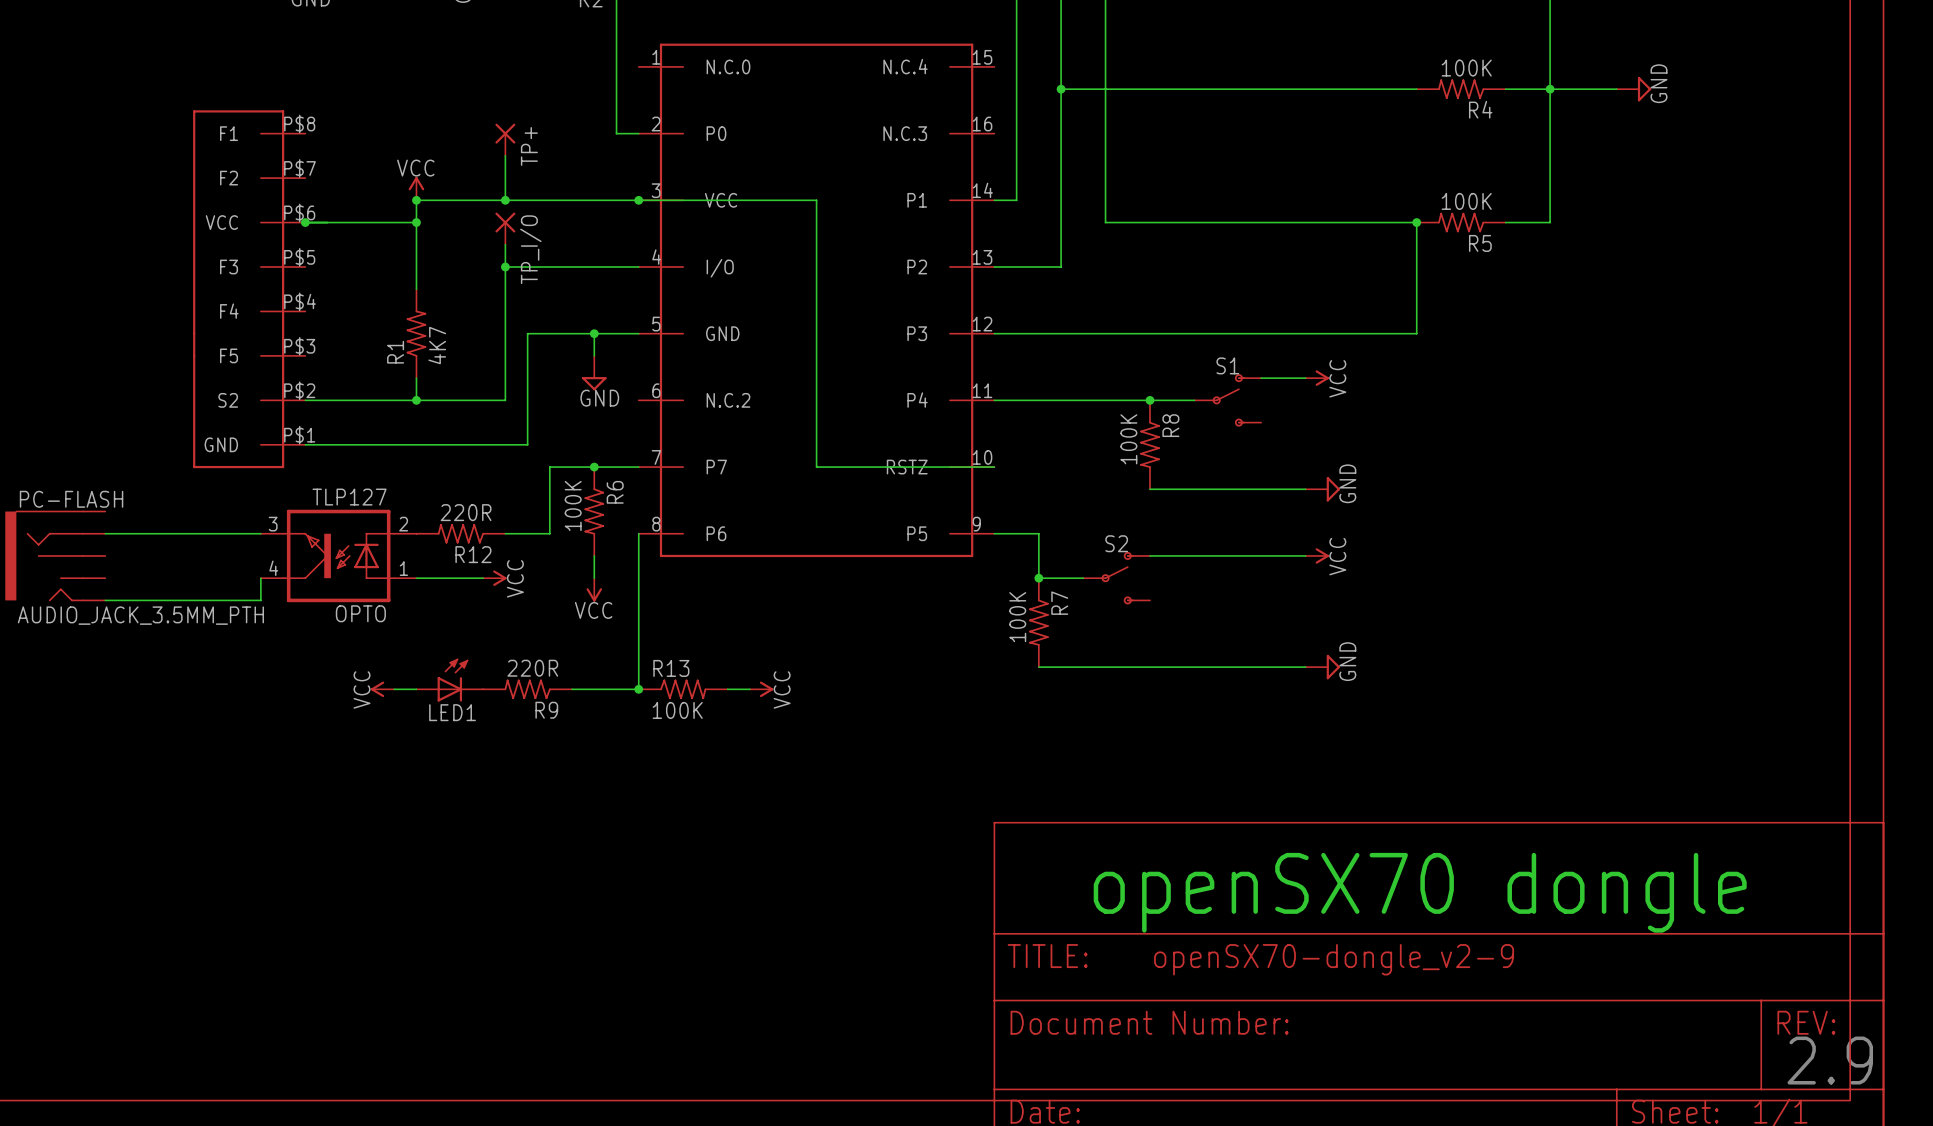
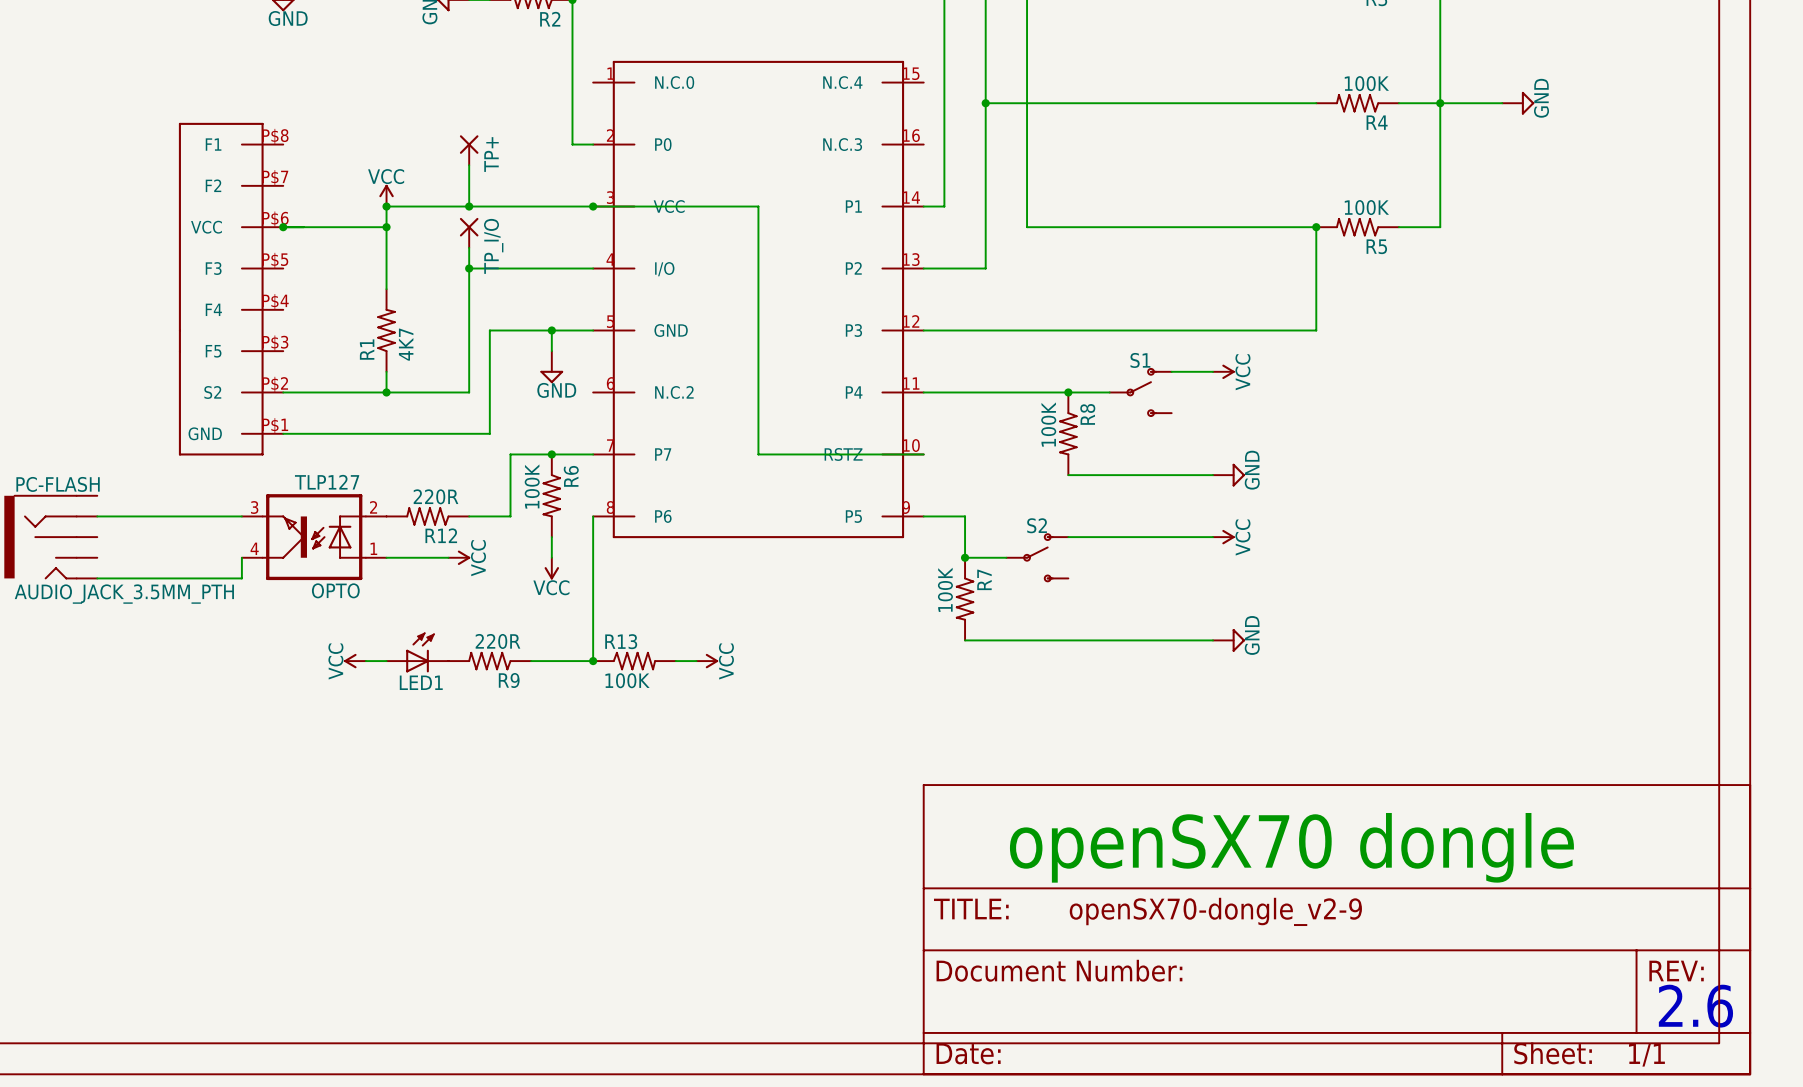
text: 2.9 (1830, 1060) -> 2.6 (1695, 1006)

